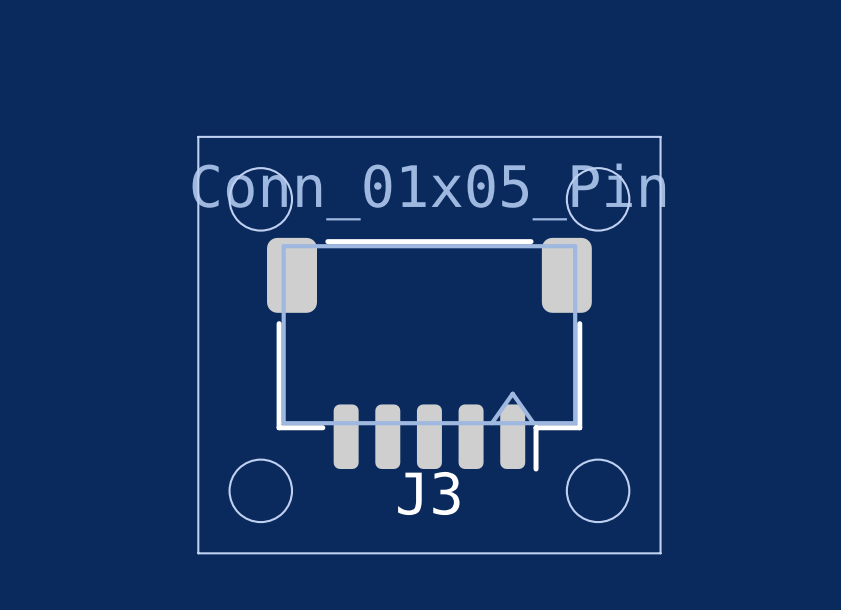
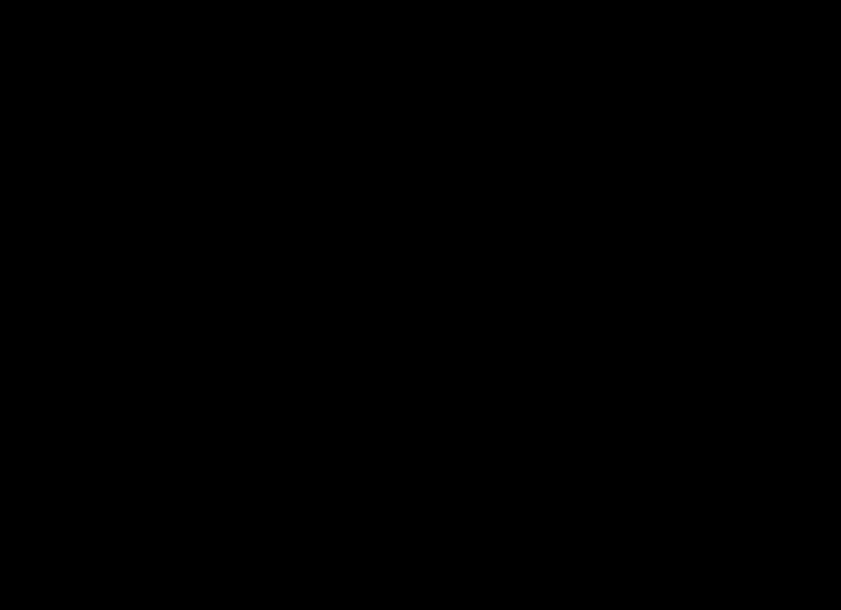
board edge: (660, 136) (198, 136) (198, 553) (660, 553) (660, 136) -> none
round board edge: [228, 167, 294, 232] -> none
round board edge: [565, 167, 631, 232] -> none
J3: Conn_01x05_Pin (429, 354) -> none
round board edge: [228, 458, 294, 524] -> none
round board edge: [565, 458, 631, 524] -> none

